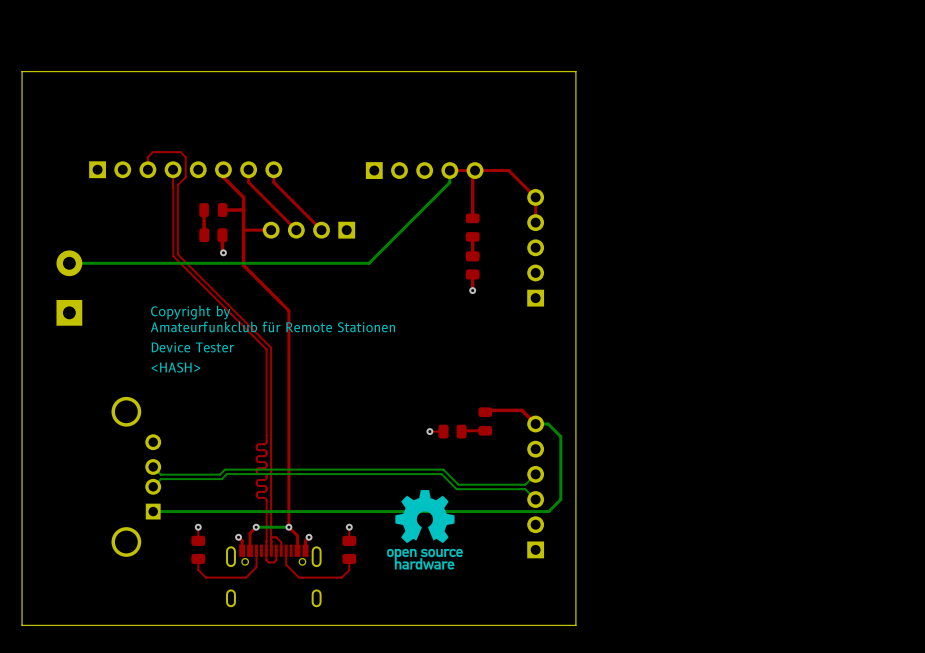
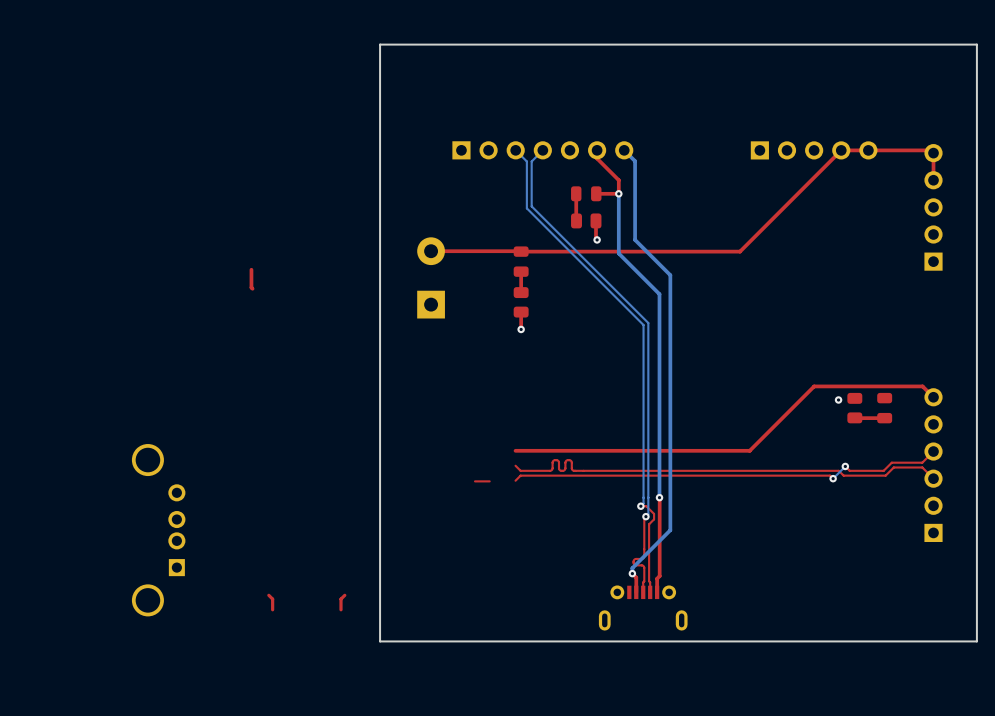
board edge: none -> (976, 44) (380, 44) (380, 641) (976, 641) (976, 44)
board edge: (575, 71) (22, 71) (22, 625) (575, 625) (575, 71) -> none
bottom track: none -> (515, 150) (526, 161) (526, 208) (643, 325) (643, 503) (640, 506)
bottom track: none -> (542, 150) (531, 161) (531, 206) (648, 323) (648, 514) (645, 516)
part: none -> (542, 150)
top track: none -> (597, 150) (597, 158) (618, 180) (618, 193) (596, 193)
bottom track: none -> (624, 150) (635, 161) (635, 239) (670, 275) (670, 530) (632, 568) (632, 573)
part: none -> (814, 150)
top track: none -> (576, 193) (576, 220)
part: none -> (586, 193)
bottom track: none -> (618, 193) (618, 253) (659, 294) (659, 497)
via: none -> (618, 193)
top track: (147, 169) (147, 157) (152, 152) (180, 152) (185, 157) (185, 177) (177, 185) (177, 254) (271, 347) (271, 541) -> none
top track: (173, 169) (173, 256) (266, 349) (266, 442) (256, 446) (257, 449) (266, 452) (265, 455) (258, 456) (256, 458) (257, 461) (266, 464) (265, 467) (258, 468) (256, 470) (257, 473) (266, 476) (265, 479) (258, 480) (256, 482) (257, 485) (266, 488) (265, 491) (258, 492) (256, 494) (257, 497) (266, 499) (266, 559) -> none
part: (185, 169) -> none
top track: (223, 169) (223, 177) (243, 197) (243, 265) (288, 310) (288, 527) (297, 535) (297, 550) -> none
top track: (273, 169) (273, 182) (321, 230) -> none
part: (424, 170) -> none
top track: (449, 170) (508, 170) (535, 197) (535, 222) -> none
bottom track: (449, 170) (449, 182) (369, 263) (69, 263) -> none
top track: (475, 170) (472, 172) (472, 218) -> (933, 180) (933, 153) (930, 150) (841, 150) (740, 251) (521, 251)
top track: (251, 172) (248, 169) (248, 182) (296, 230) -> none
part: none -> (933, 207)
part: none -> (586, 220)
top track: none -> (596, 220) (597, 239)
via: none -> (597, 239)
top track: (204, 210) (204, 235) -> none
part: (213, 210) -> none
top track: (243, 210) (222, 210) -> none
top track: none -> (520, 251) (431, 251)
top track: (271, 230) (243, 230) -> none
part: (308, 230) -> none
part: (213, 235) -> none
part: none -> (431, 277)
part: (535, 247) -> none
via: (223, 252) -> none
part: (69, 288) -> none
text: Copyright by (190, 312) -> none
text: Amateurfunkclub für Remote Stationen (272, 326) -> none
text: Device Tester (192, 347) -> none
top track: none -> (933, 397) (922, 386) (814, 386) (749, 450) (515, 450)
via: none -> (838, 399)
part: none -> (854, 408)
part: none -> (884, 408)
text: <HASH> (175, 367) -> none
top track: none -> (854, 417) (884, 418)
top track: none -> (933, 451) (922, 462) (891, 462) (883, 470) (849, 470) (845, 466)
top track: (487, 410) (522, 410) (535, 424) -> none
part: none -> (933, 465)
top track: none -> (515, 465) (520, 470) (550, 470) (552, 468) (552, 461) (556, 460) (558, 462) (559, 469) (563, 470) (565, 468) (565, 461) (569, 460) (571, 461) (571, 468) (574, 470) (838, 470) (843, 475) (885, 475) (893, 467) (922, 467) (933, 478)
bottom track: none -> (845, 466) (833, 478)
via: none -> (845, 466)
part: (485, 421) -> none
bottom track: (535, 424) (548, 424) (560, 436) (560, 499) (548, 511) (153, 511) -> none
top track: none -> (833, 478) (830, 475) (520, 475) (515, 480)
via: none -> (833, 478)
top track: (485, 430) (461, 431) -> none
via: (429, 431) -> none
part: (452, 431) -> none
top track: none -> (659, 497) (659, 576) (657, 578) (657, 592)
via: none -> (659, 497)
top track: none -> (640, 506) (646, 506) (654, 513) (654, 519) (649, 524) (650, 592)
via: none -> (640, 506)
top track: none -> (645, 516) (644, 518) (644, 556) (635, 559) (633, 561) (635, 565) (644, 567) (643, 592)
via: none -> (645, 516)
bottom track: (153, 466) (160, 474) (220, 474) (225, 469) (443, 469) (458, 484) (525, 484) (535, 474) -> none
bottom track: (153, 486) (160, 479) (221, 479) (226, 474) (441, 474) (456, 489) (525, 489) (535, 499) -> none
part: (535, 486) -> none
drawing: [387, 490, 463, 570] -> none
top track: none -> (632, 573) (636, 577) (636, 592)
via: none -> (632, 573)
top track: (198, 527) (198, 540) -> none
via: (198, 527) -> none
top track: (256, 527) (250, 533) (250, 550) -> none
via: (256, 527) -> none
bottom track: (288, 527) (256, 527) -> none
via: (288, 527) -> none
top track: (349, 527) (349, 540) -> none
via: (349, 527) -> none
via: (238, 537) -> none
via: (309, 537) -> none
part: (198, 549) -> none
part: (349, 549) -> none
part: none -> (643, 608)
top track: (256, 550) (256, 567) (246, 577) (205, 577) (198, 570) (198, 558) -> none
top track: (276, 550) (276, 560) (274, 562) (268, 562) (266, 559) -> none
top track: (281, 550) (281, 542) (276, 537) (271, 537) (271, 550) -> none
top track: (286, 550) (286, 564) (298, 577) (341, 577) (349, 570) (349, 558) -> none
part: (273, 575) -> none

